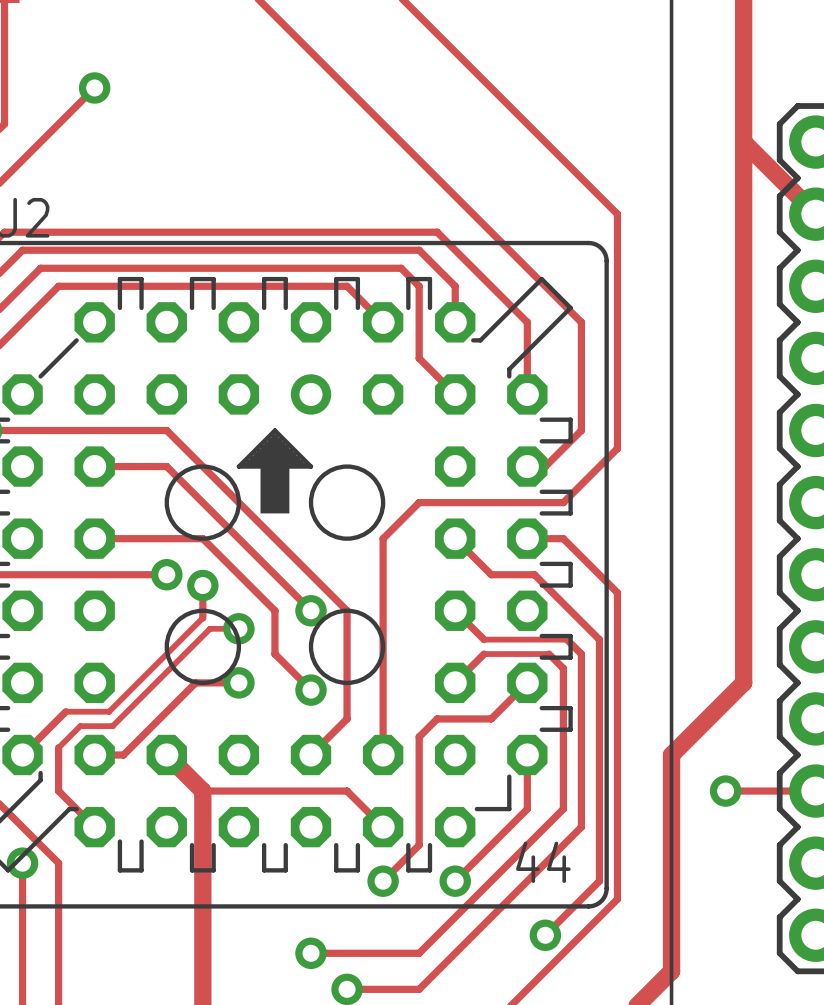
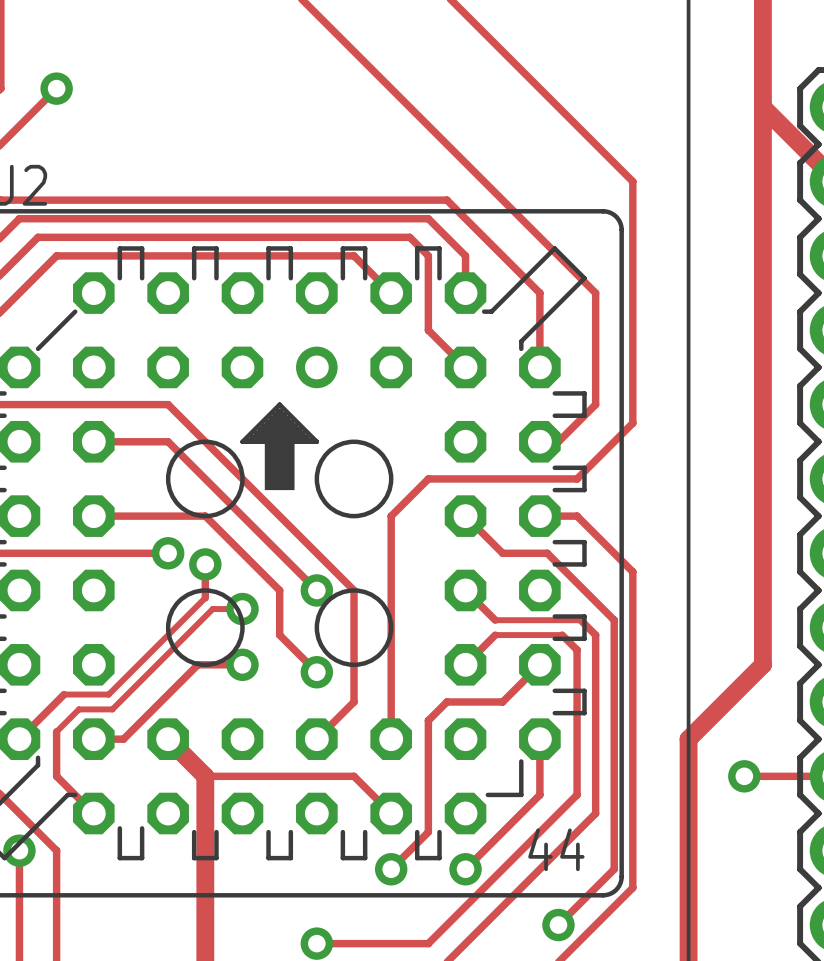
track: (94, 87) (58, 124) -> none
via position: (94, 87) -> (56, 88)

